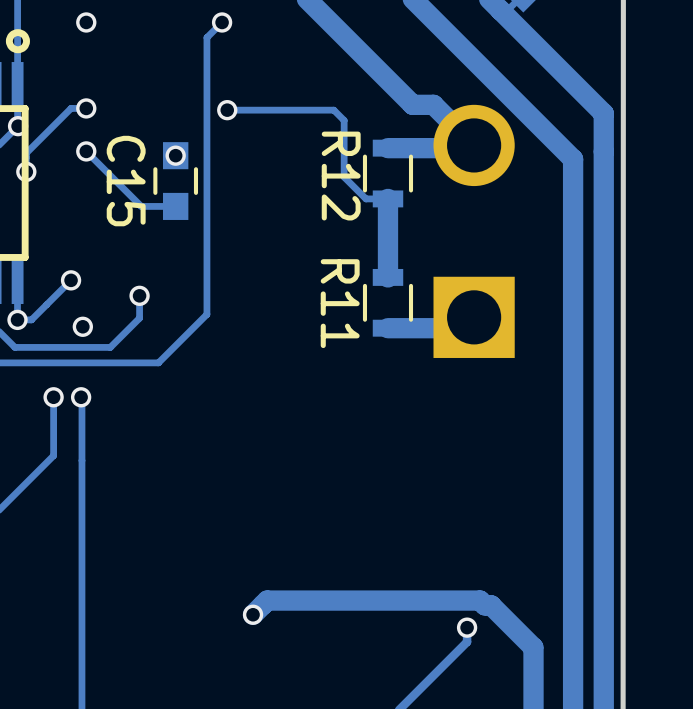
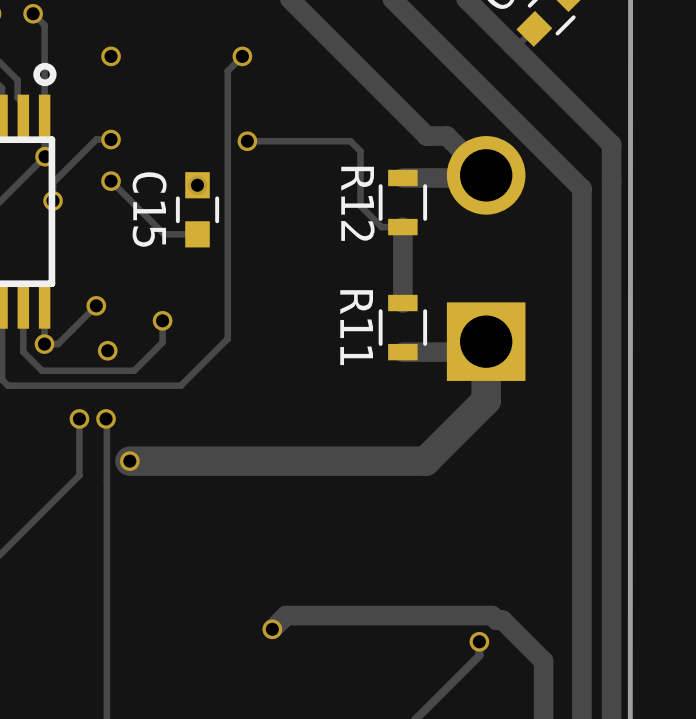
track: none -> (486, 341) (486, 400) (425, 461) (129, 461)
via: none -> (129, 461)

